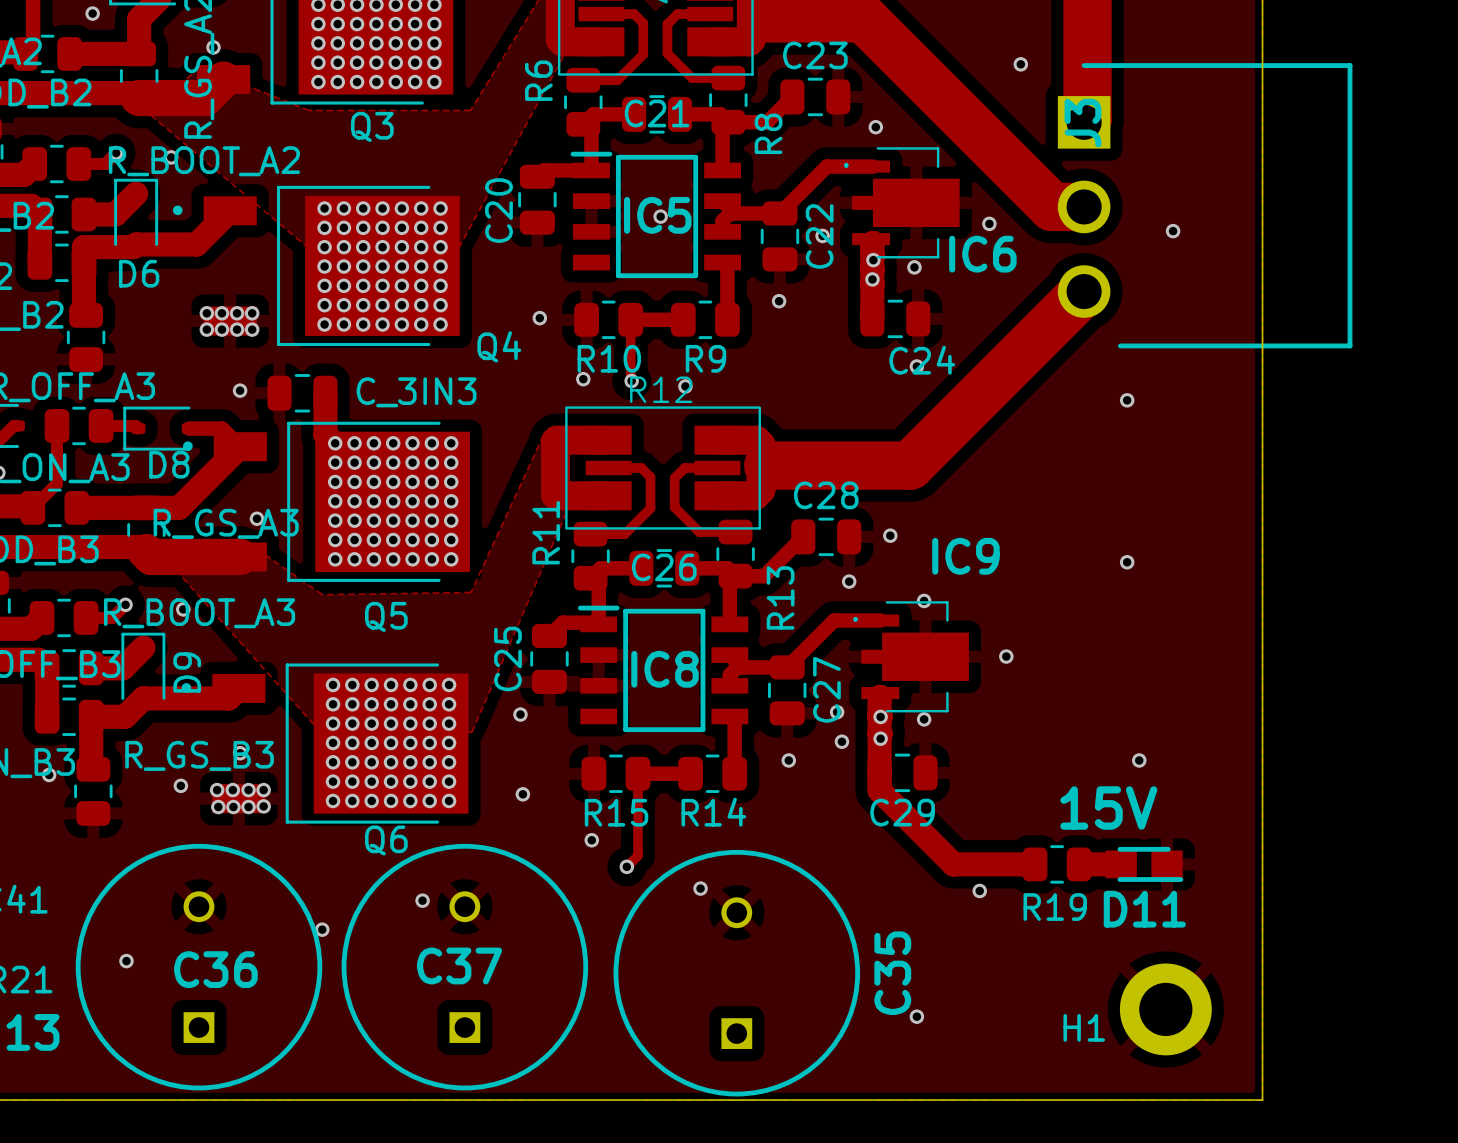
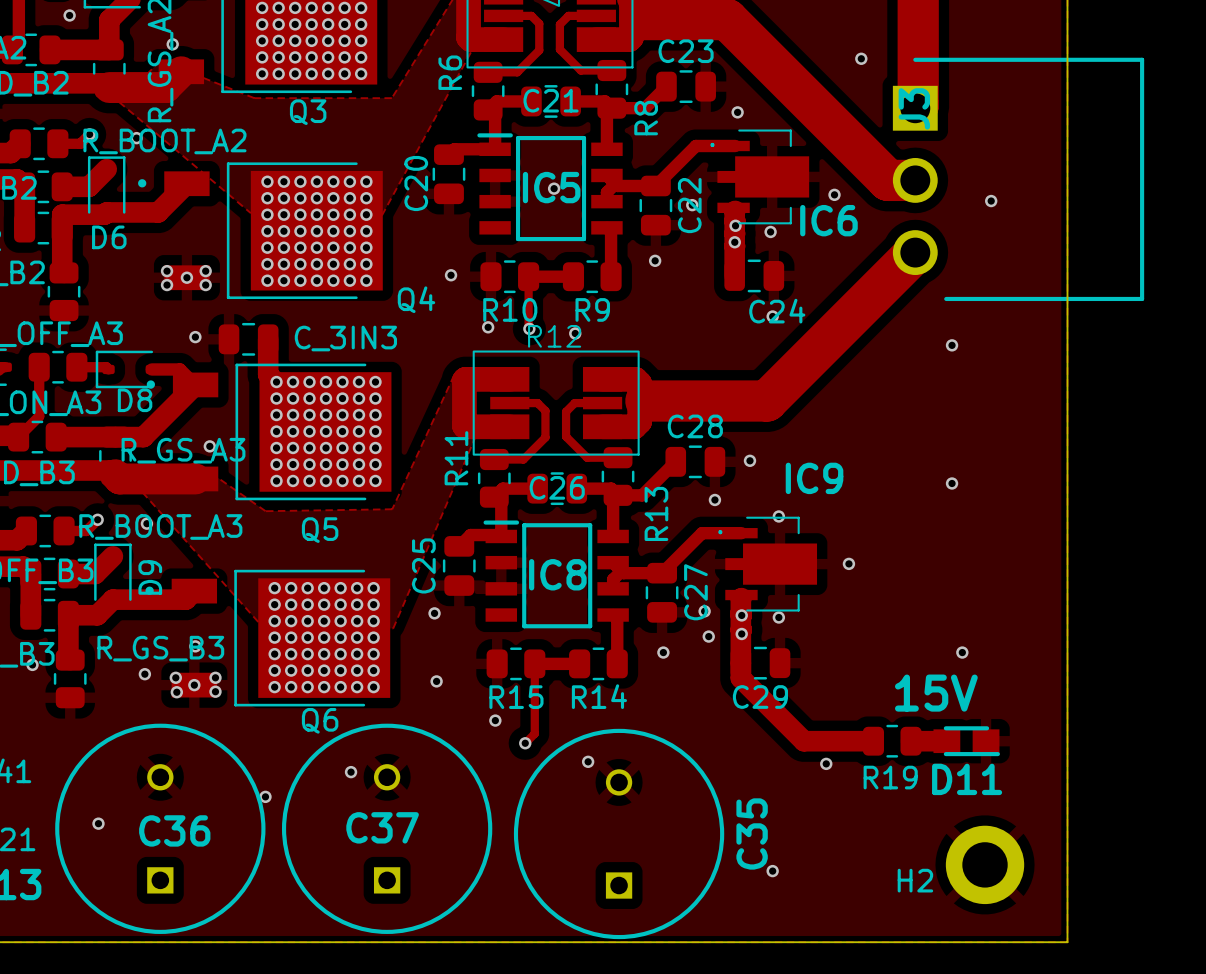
via: (221, 313) -> none
via: (237, 313) -> none
via: none -> (186, 277)
via: (221, 329) -> none
via: (237, 329) -> none
via: (232, 790) -> none
via: (248, 790) -> none
via: none -> (194, 685)
via: (233, 807) -> none
via: (248, 807) -> none
H1 name: H1 (1084, 1027) -> H2 (915, 880)

